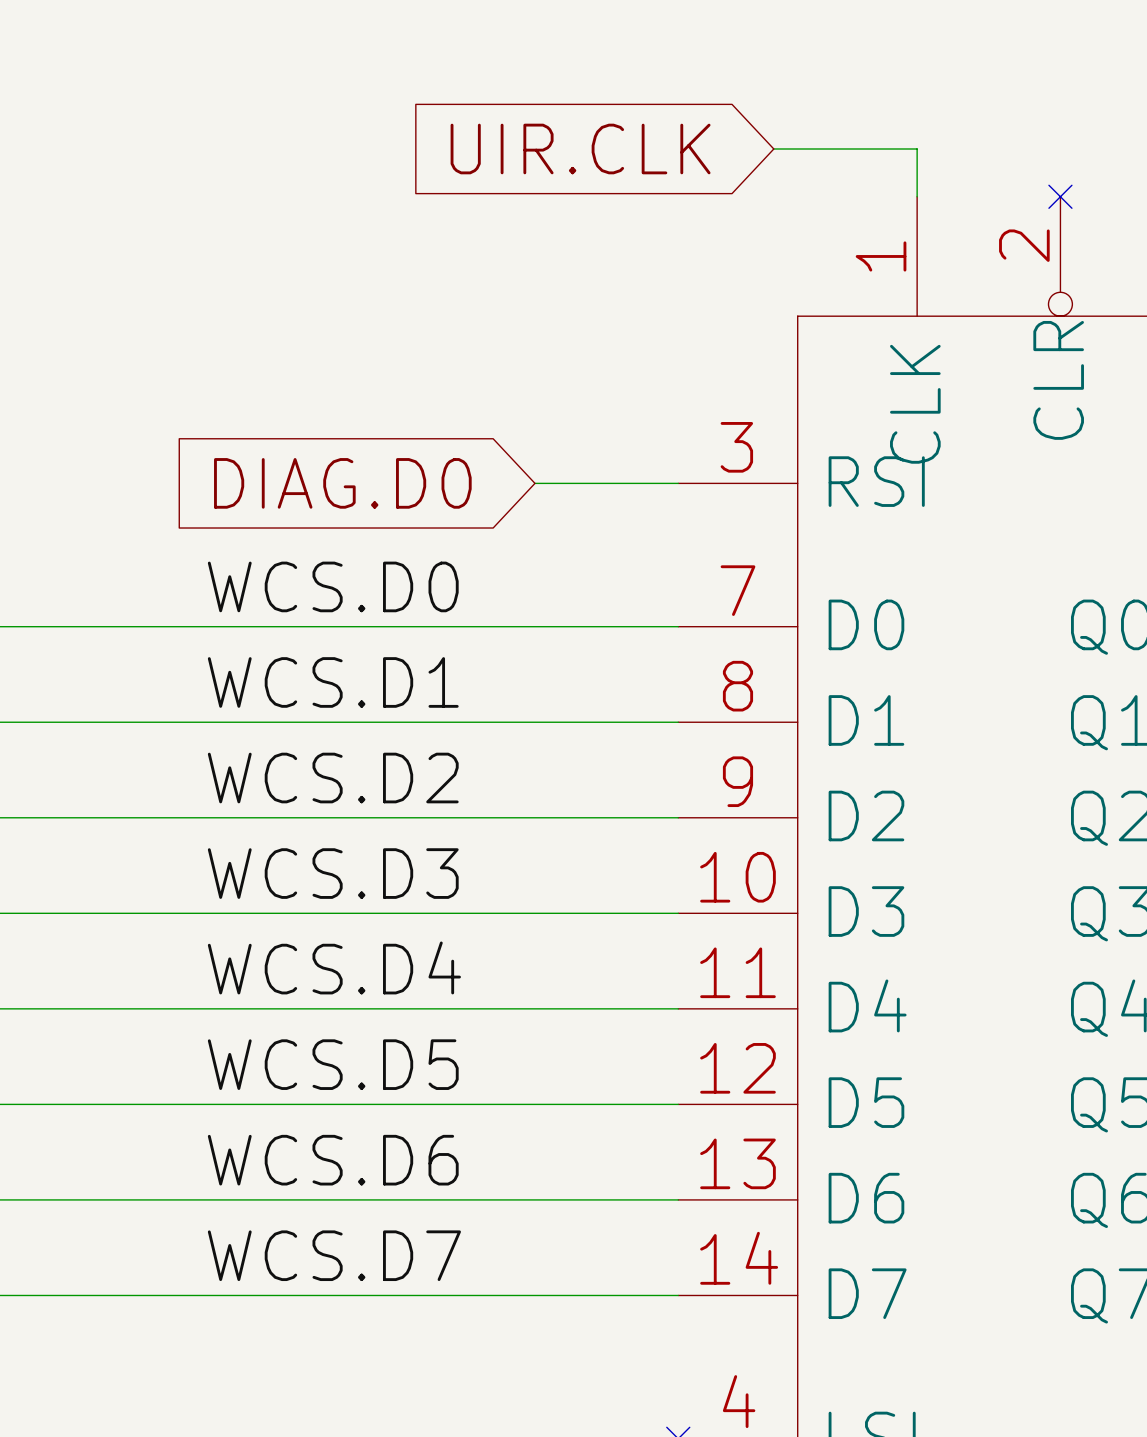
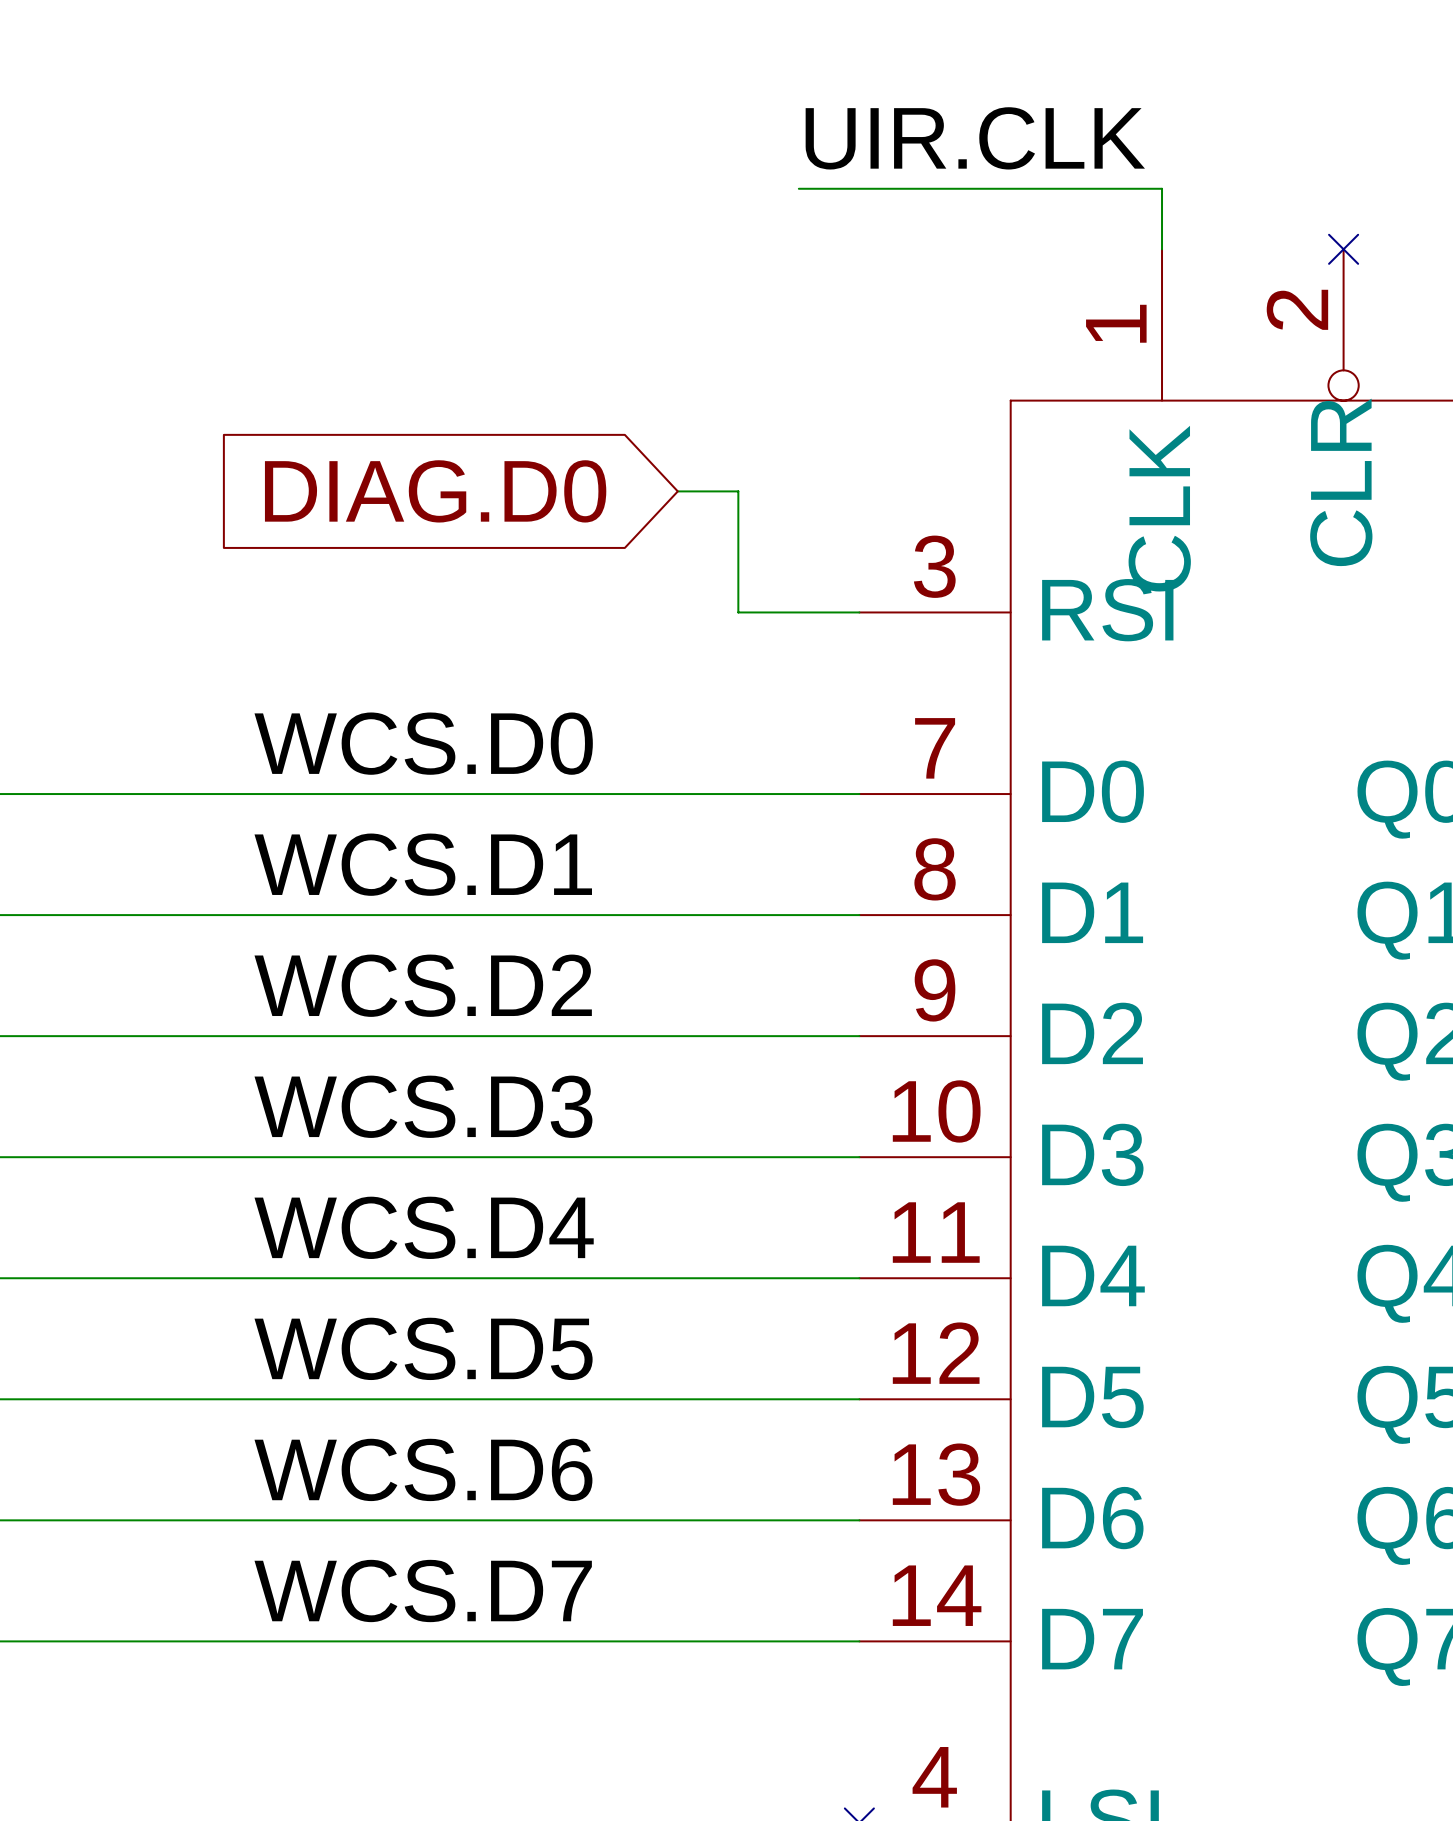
label: none -> UIR.CLK (975, 138)
global label: UIR.CLK (580, 148) -> none
wire: none -> (798, 188) (980, 188)
global label position: DIAG.D0 (342, 483) -> DIAG.D0 (435, 491)
wire: (534, 483) (582, 483) -> (677, 491) (738, 491) (738, 612)

